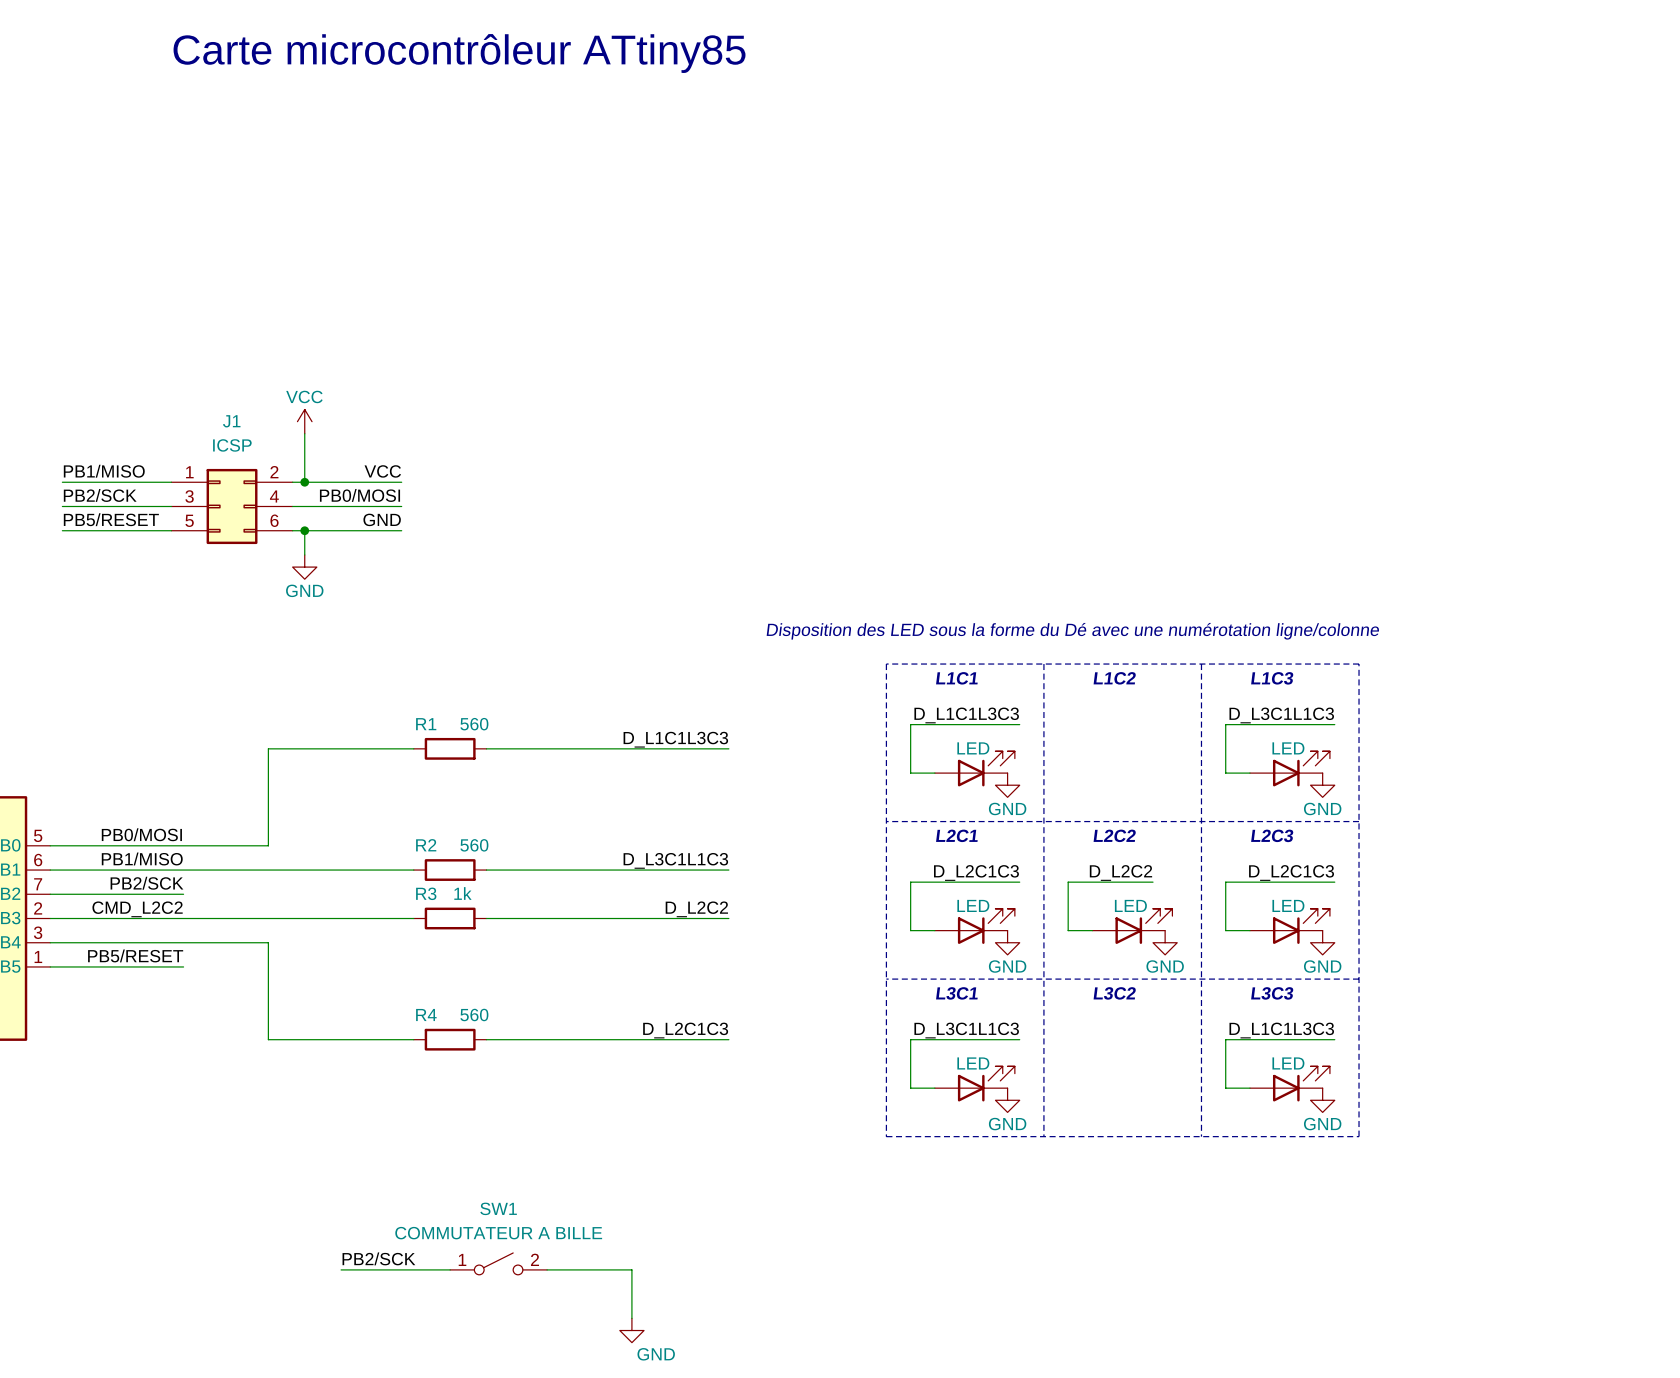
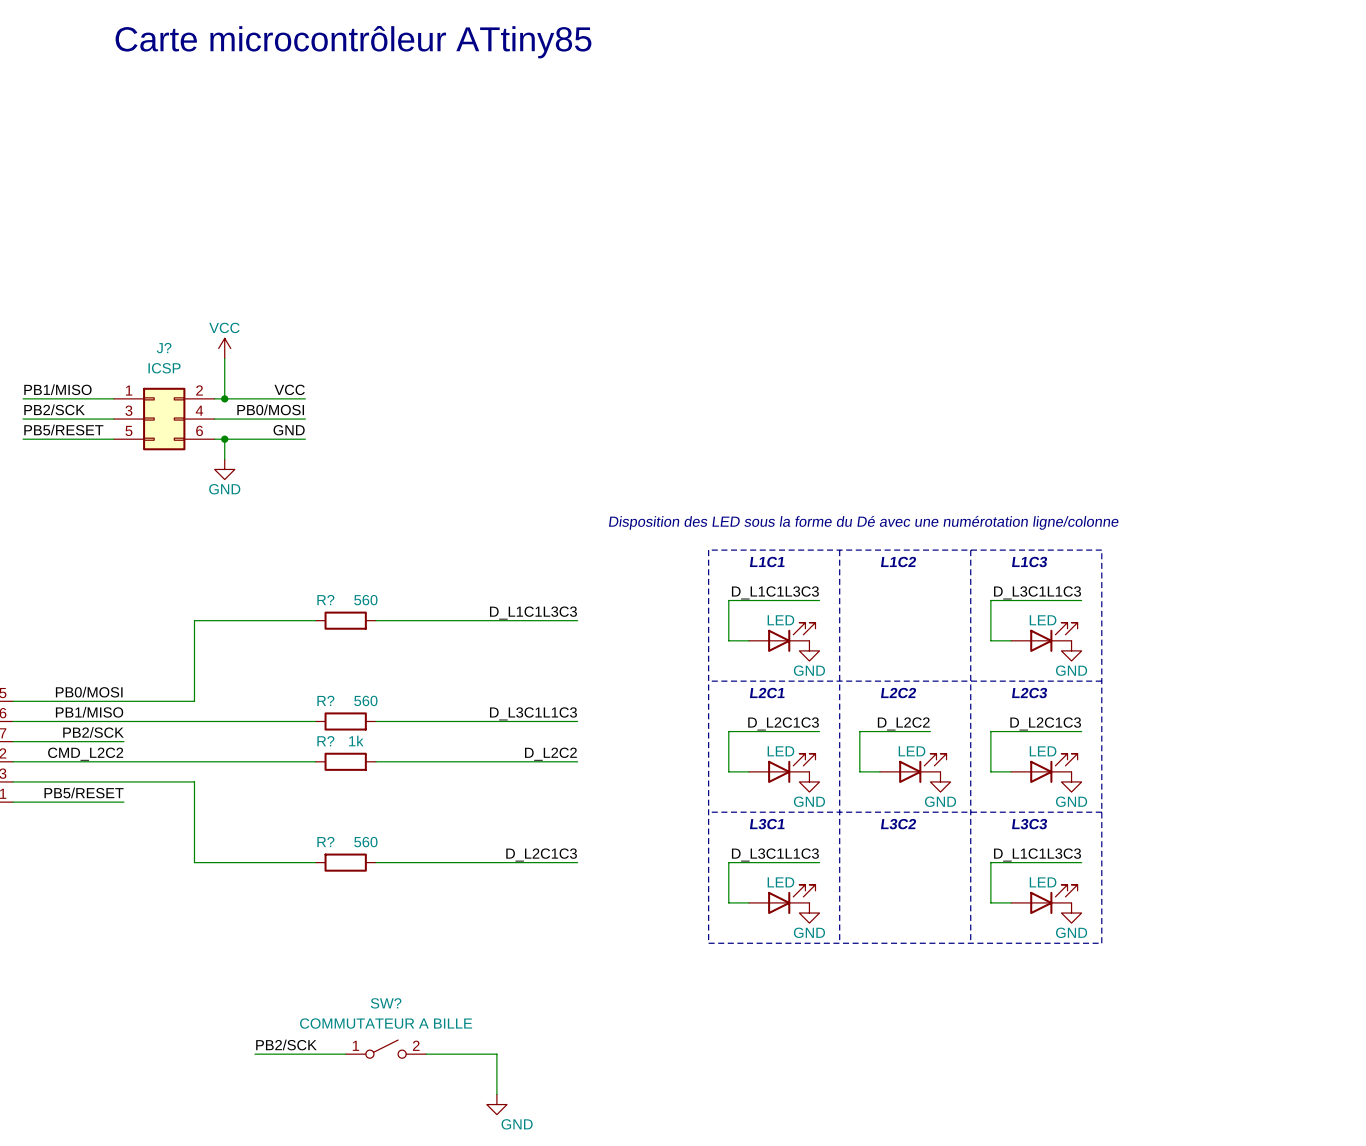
J1 name: J1 (231, 421) -> J? (164, 348)
R1 name: R1 (426, 724) -> R? (325, 600)
R2 name: R2 (426, 845) -> R? (325, 700)
R3 name: R3 (426, 893) -> R? (325, 741)
R4 name: R4 (426, 1015) -> R? (325, 842)
SW1 name: SW1 (498, 1208) -> SW? (386, 1003)

